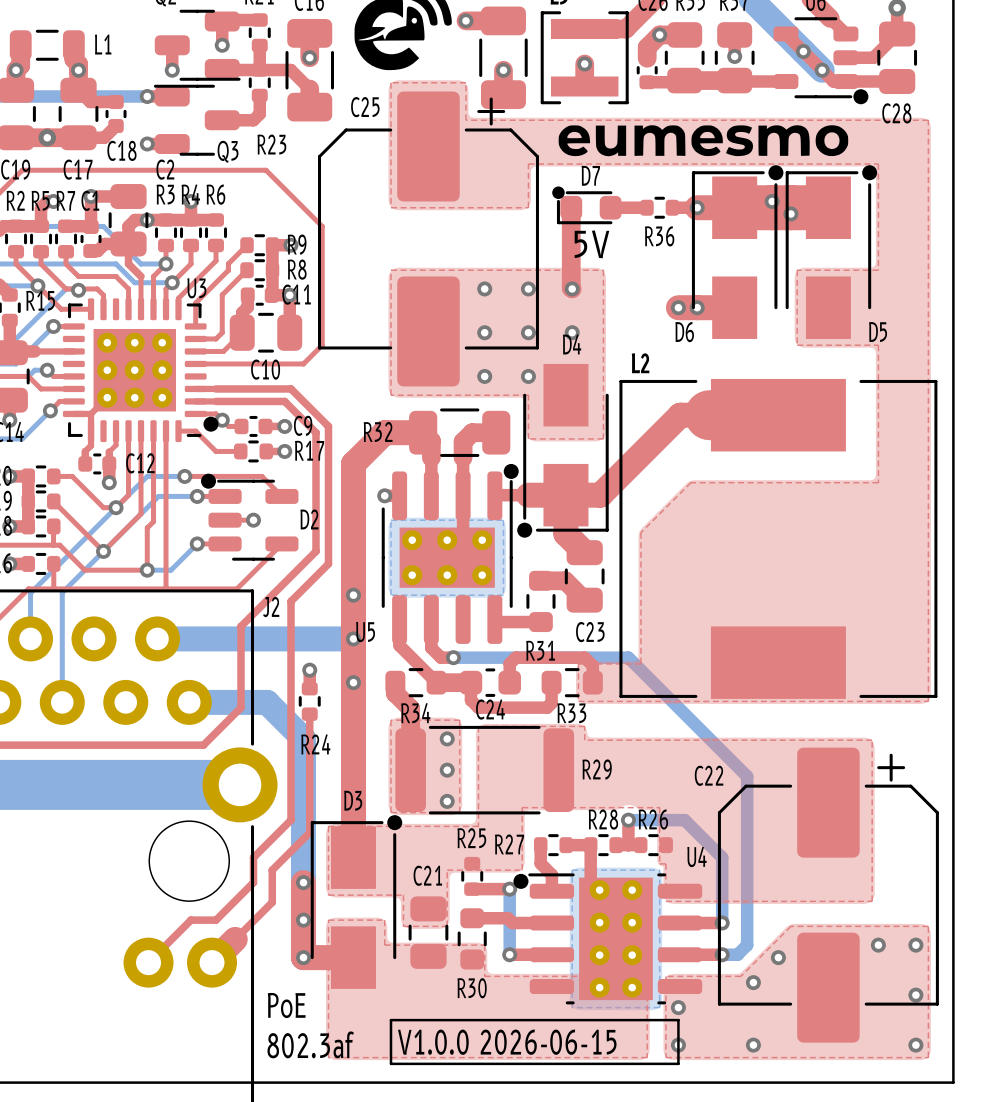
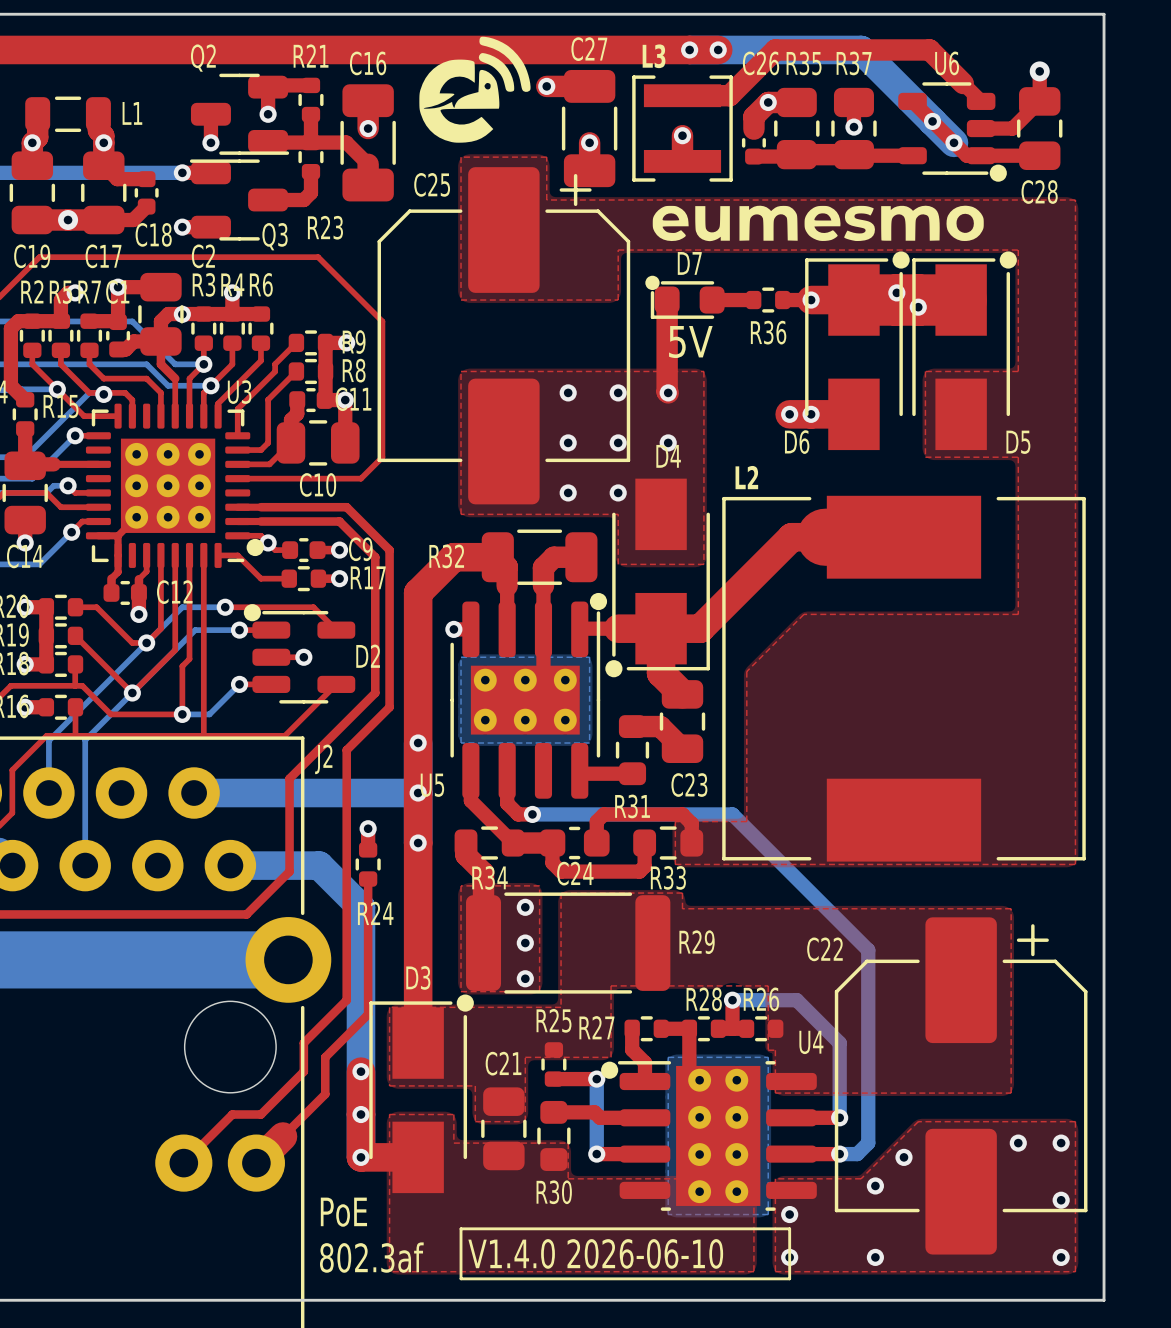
text: V1.0.0 2026-06-15 (507, 1042) -> V1.4.0 2026-06-10 (595, 1253)

